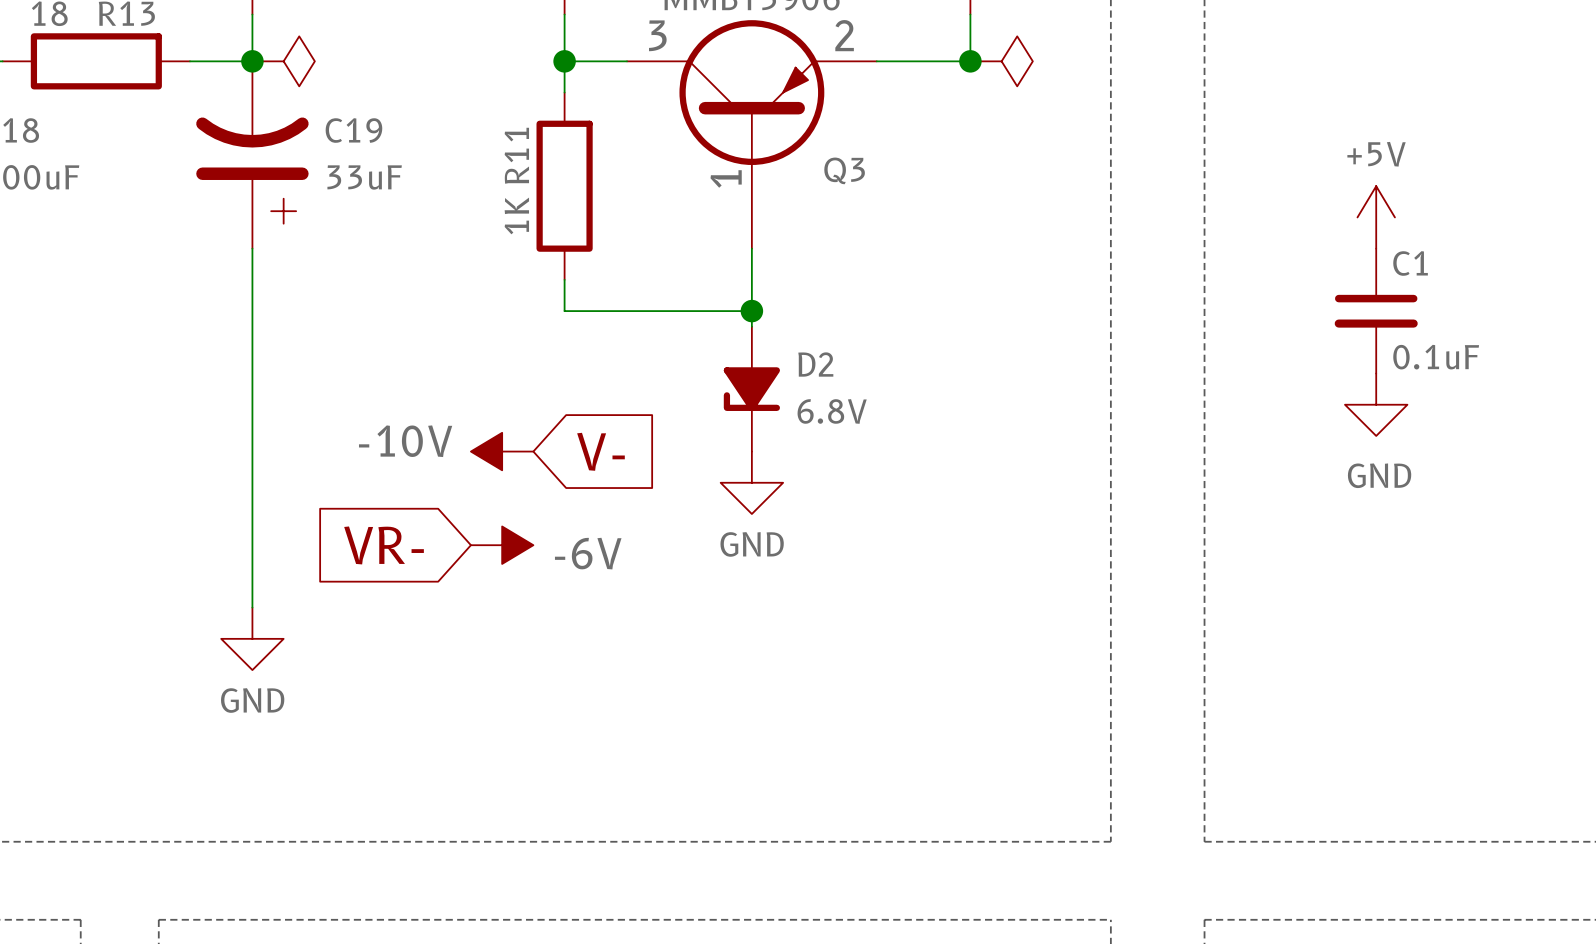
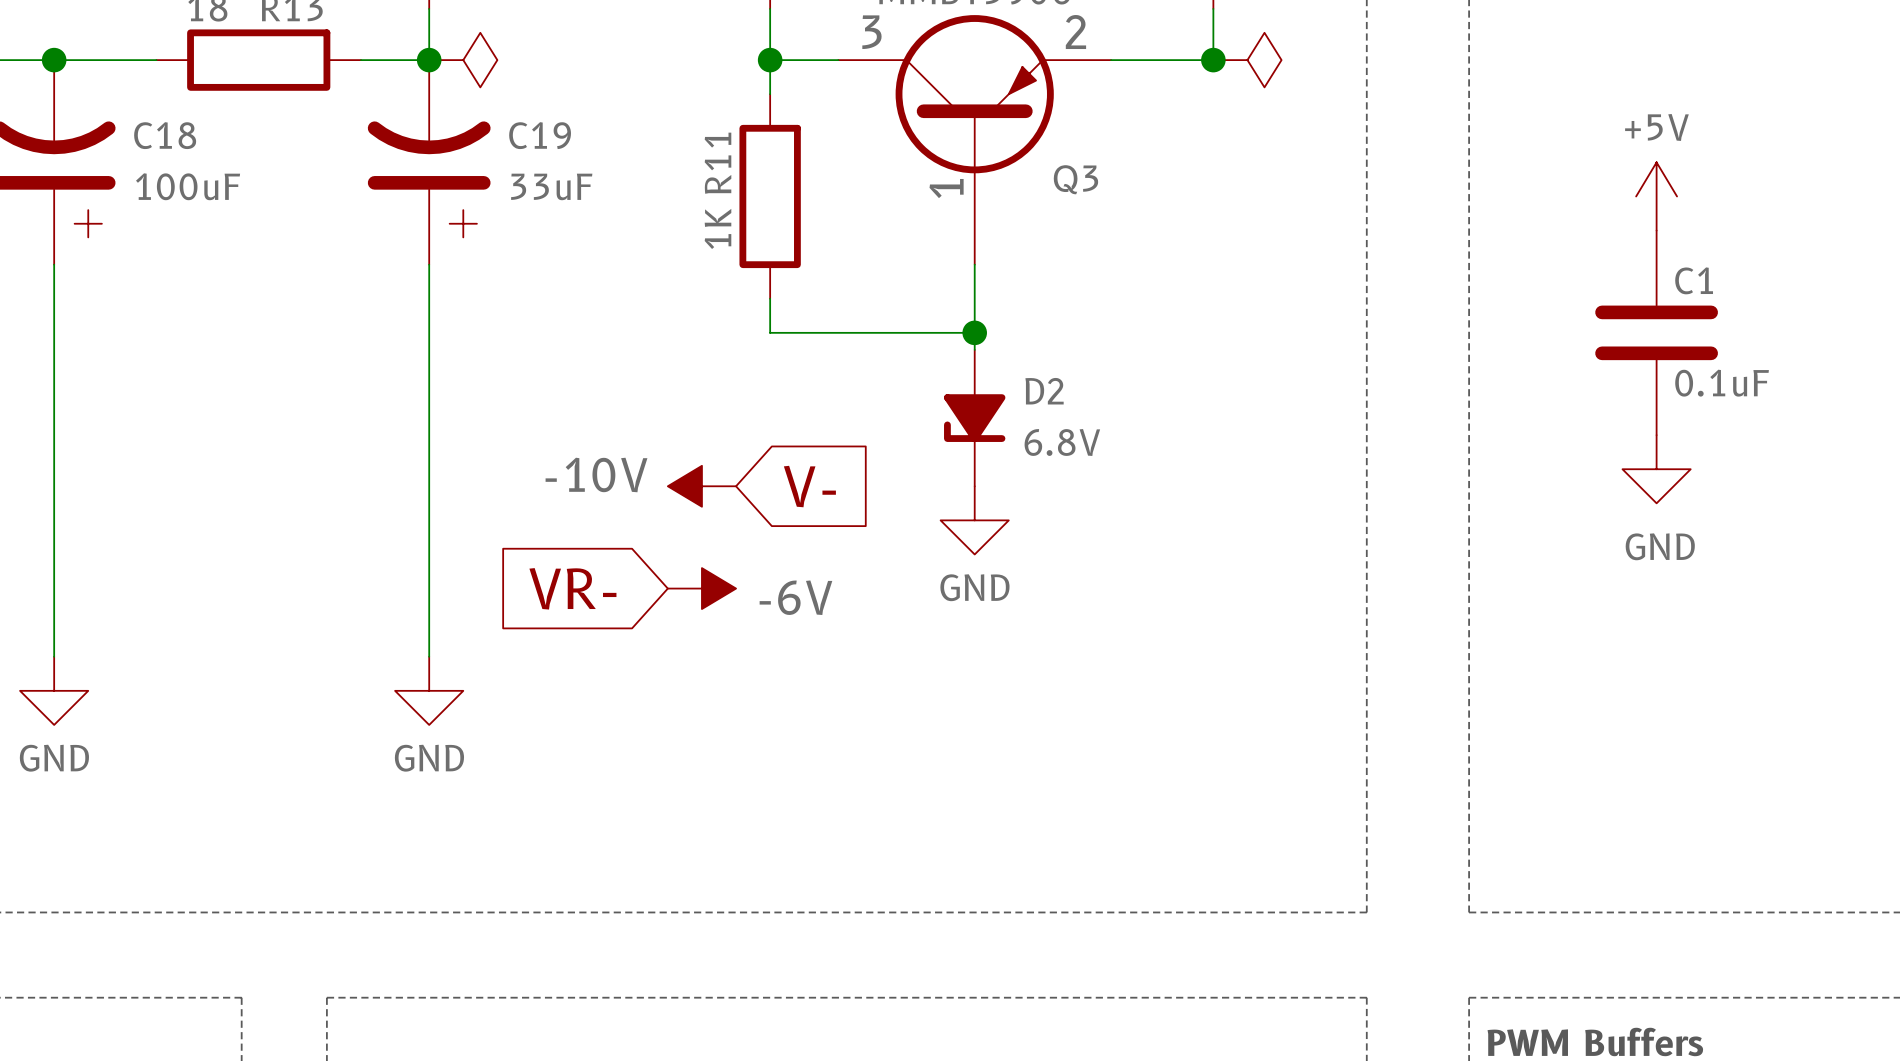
power symbol position: +5V (1376, 217) -> +5V (1656, 196)
C1 symbol: [1334, 248, 1418, 374] -> [1595, 230, 1718, 436]
power symbol position: GND (1376, 404) -> GND (1656, 469)

